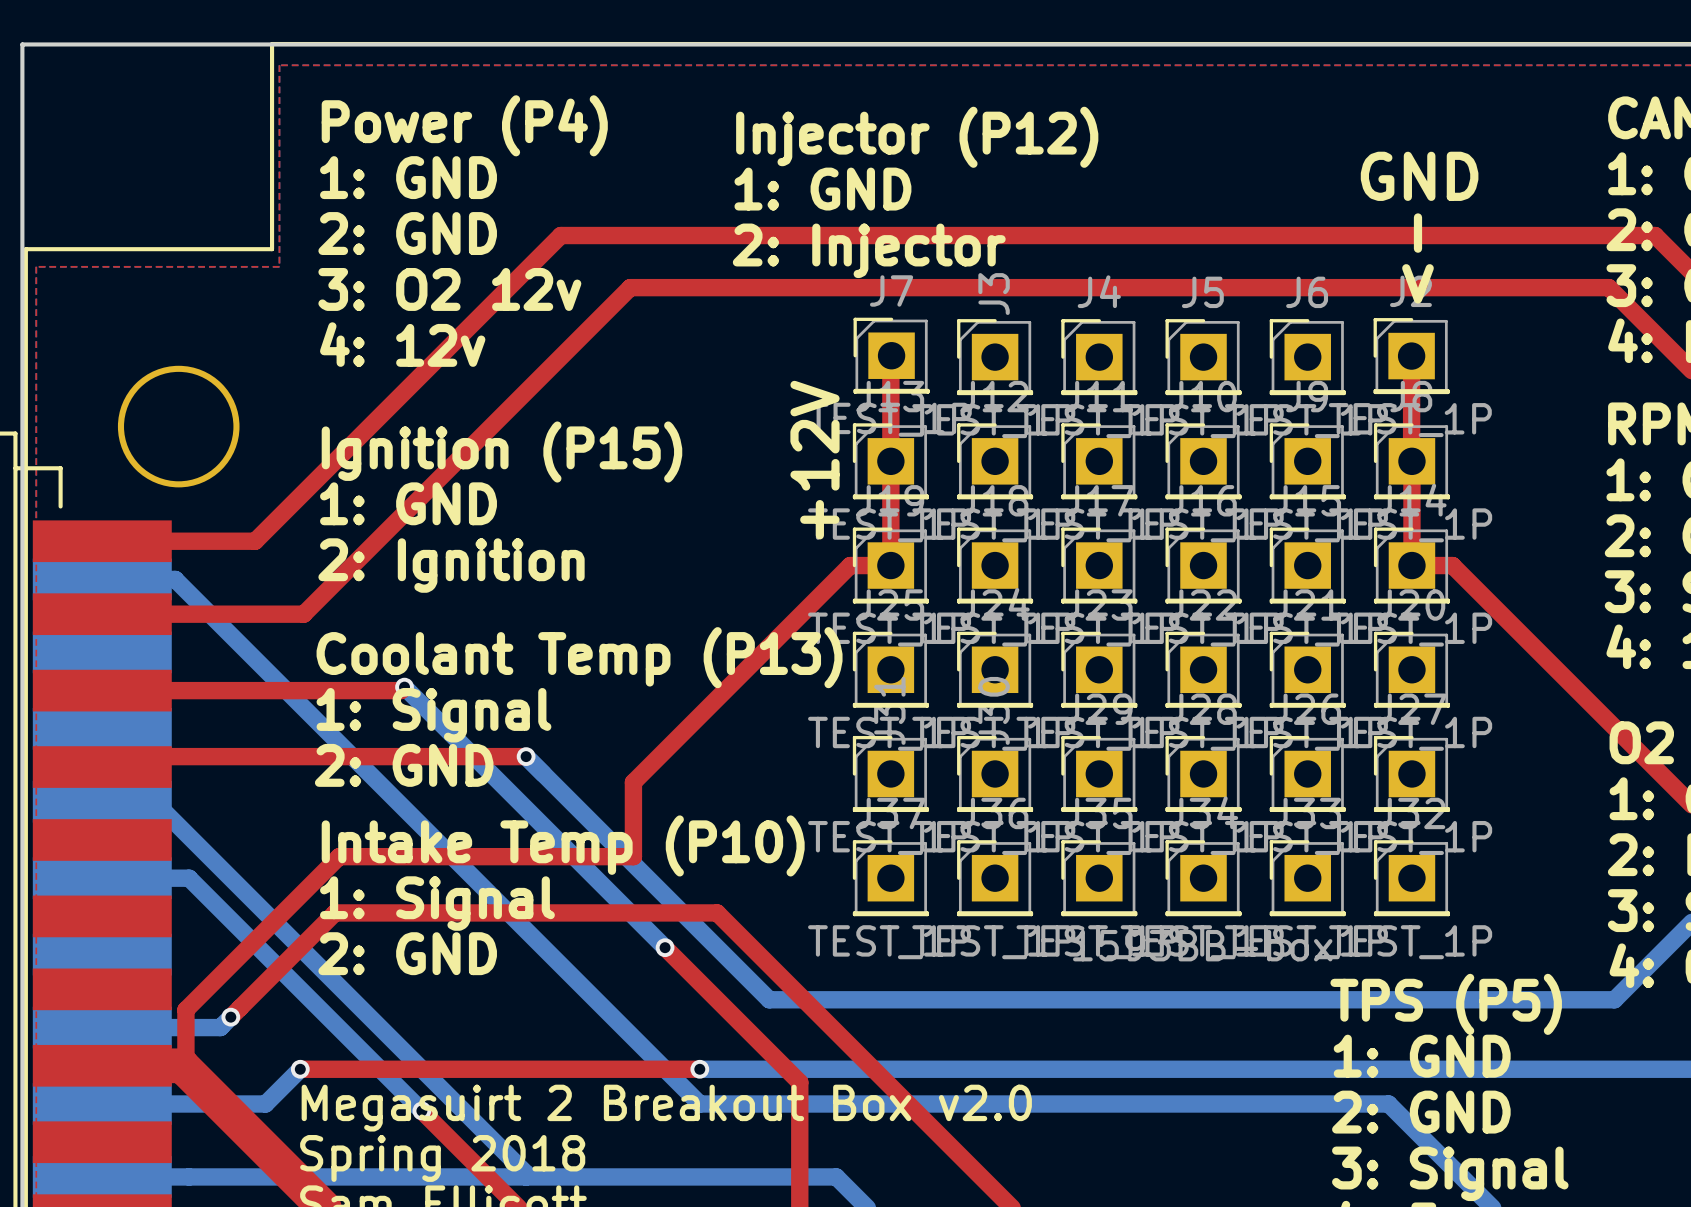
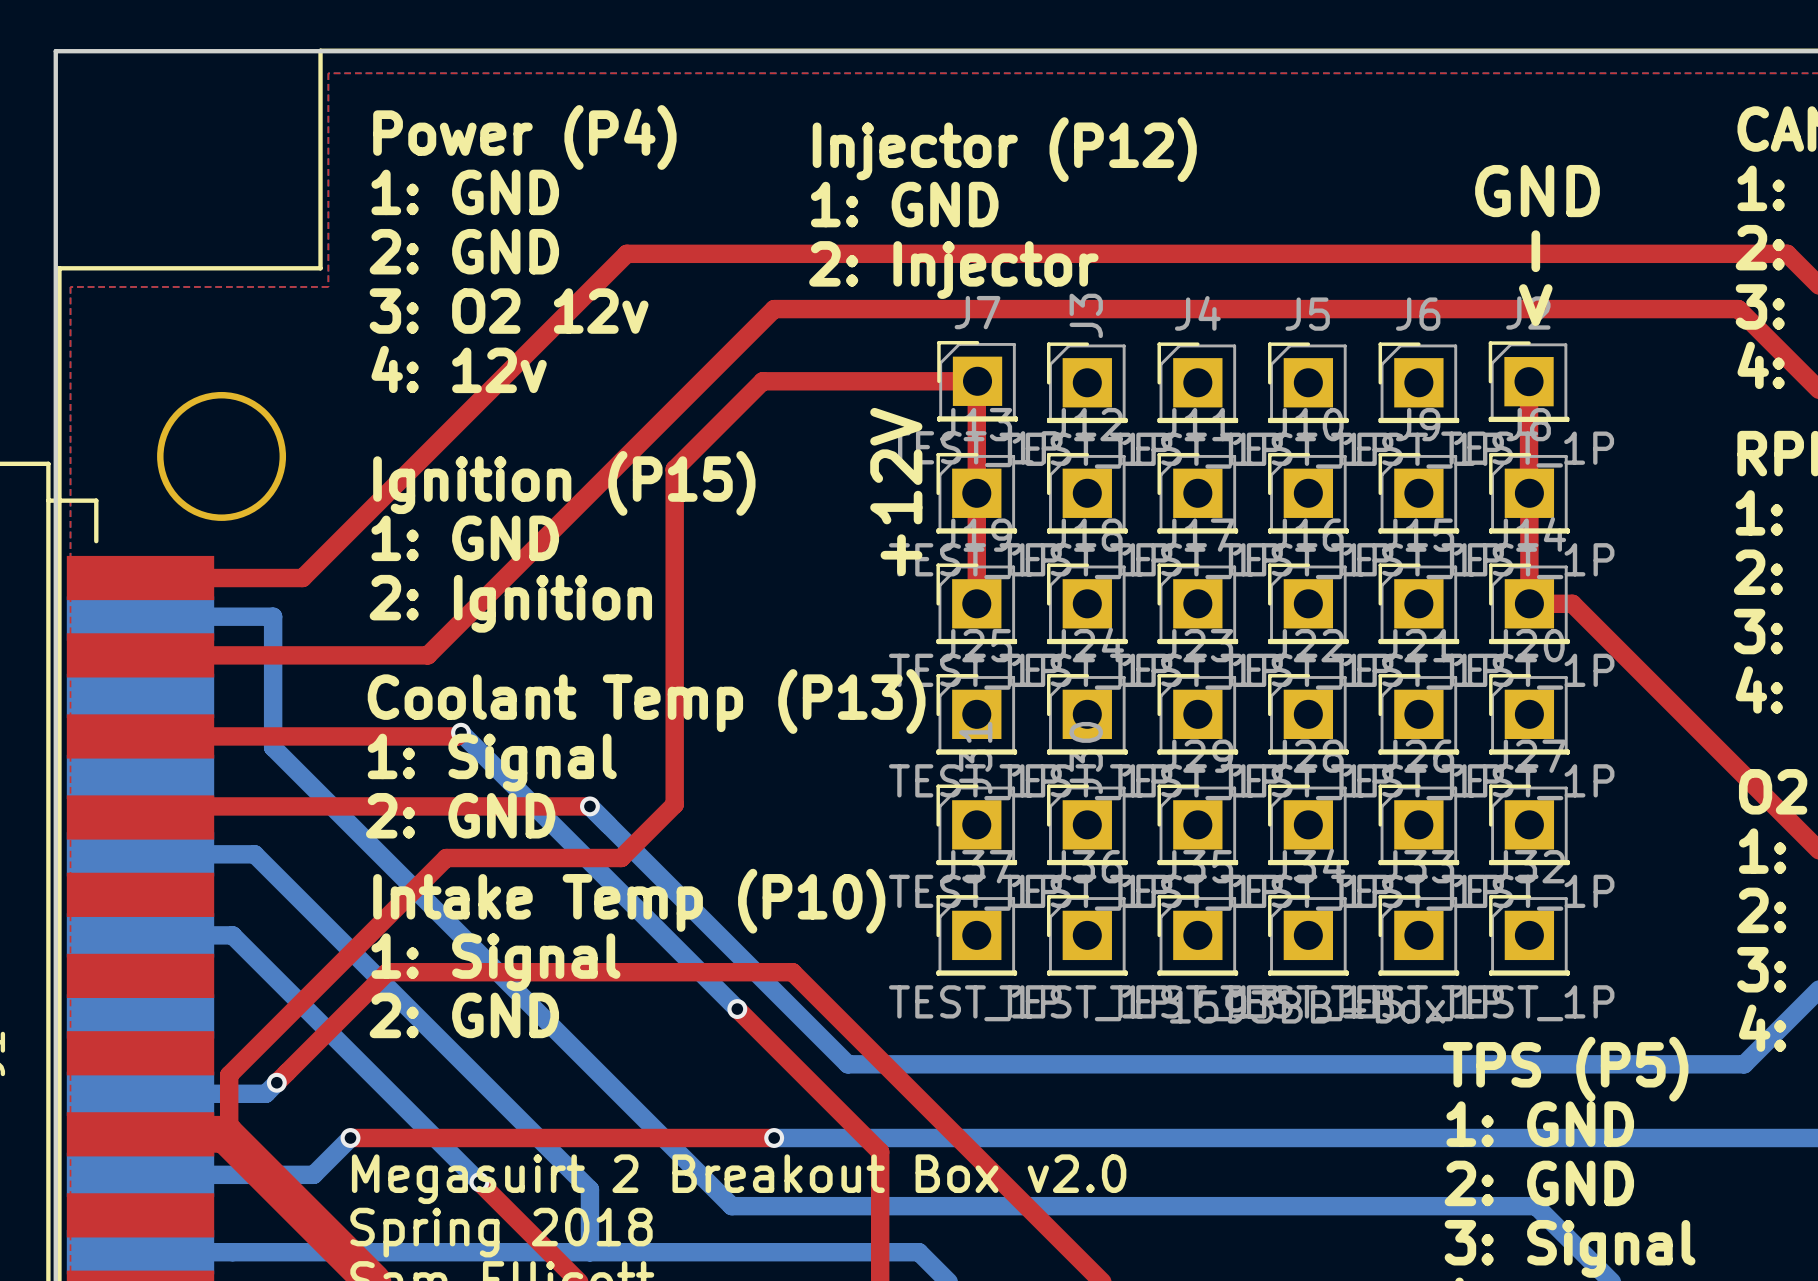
top track: (699, 287) (630, 287) (303, 614) -> (774, 309) (427, 655) (354, 655)
top track: (890, 565) (850, 565) (633, 782) (633, 856) (339, 856) -> (977, 381) (762, 381) (674, 469) (674, 804) (621, 858) (446, 858) (391, 912)
bottom track: (145, 579) (175, 579) (699, 1104) (1388, 1104) (1418, 1133) -> (185, 618) (187, 616) (273, 616) (273, 747) (731, 1206) (1536, 1206)
bottom track: (154, 801) (526, 1173) -> (195, 854) (254, 854) (589, 1189) (589, 1248)

